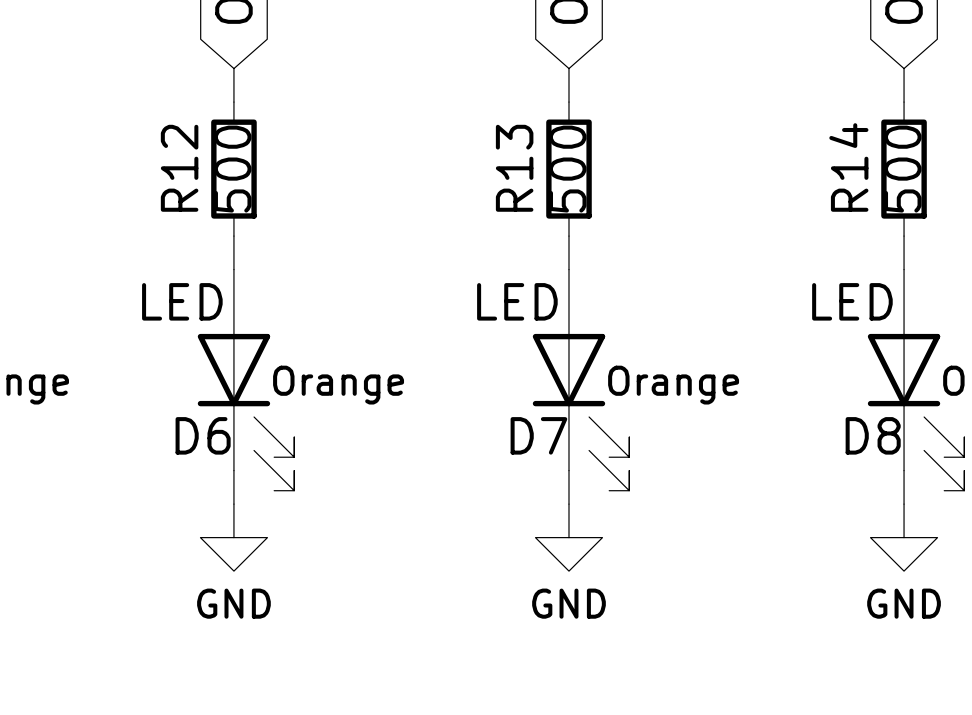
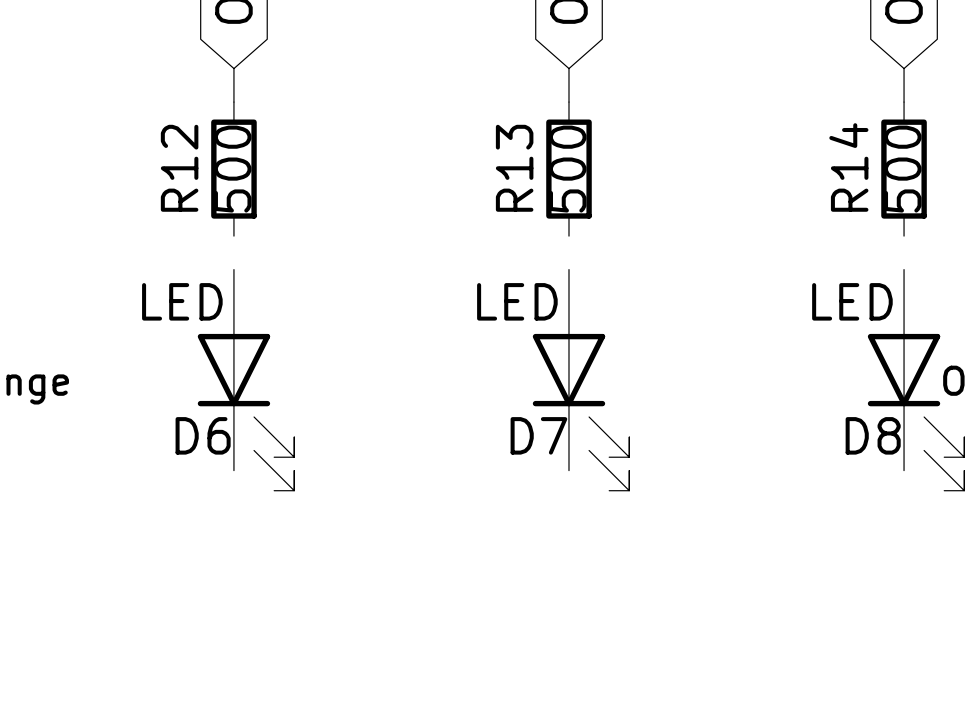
wire: (233, 236) (233, 269) -> none
wire: (568, 236) (568, 269) -> none
wire: (904, 236) (904, 269) -> none
text: Orange (338, 385) -> none
text: Orange (673, 385) -> none
wire: (233, 470) (233, 504) -> none
wire: (568, 470) (568, 504) -> none
wire: (904, 470) (904, 504) -> none
power symbol: GND (233, 537) -> none
power symbol: GND (568, 537) -> none
power symbol: GND (904, 537) -> none

